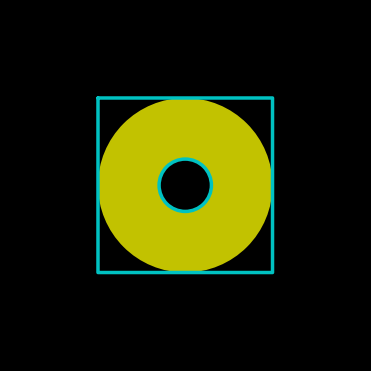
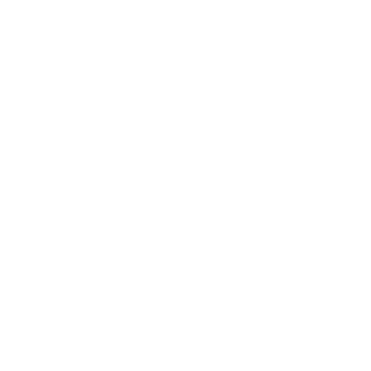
part: (185, 185) -> none

